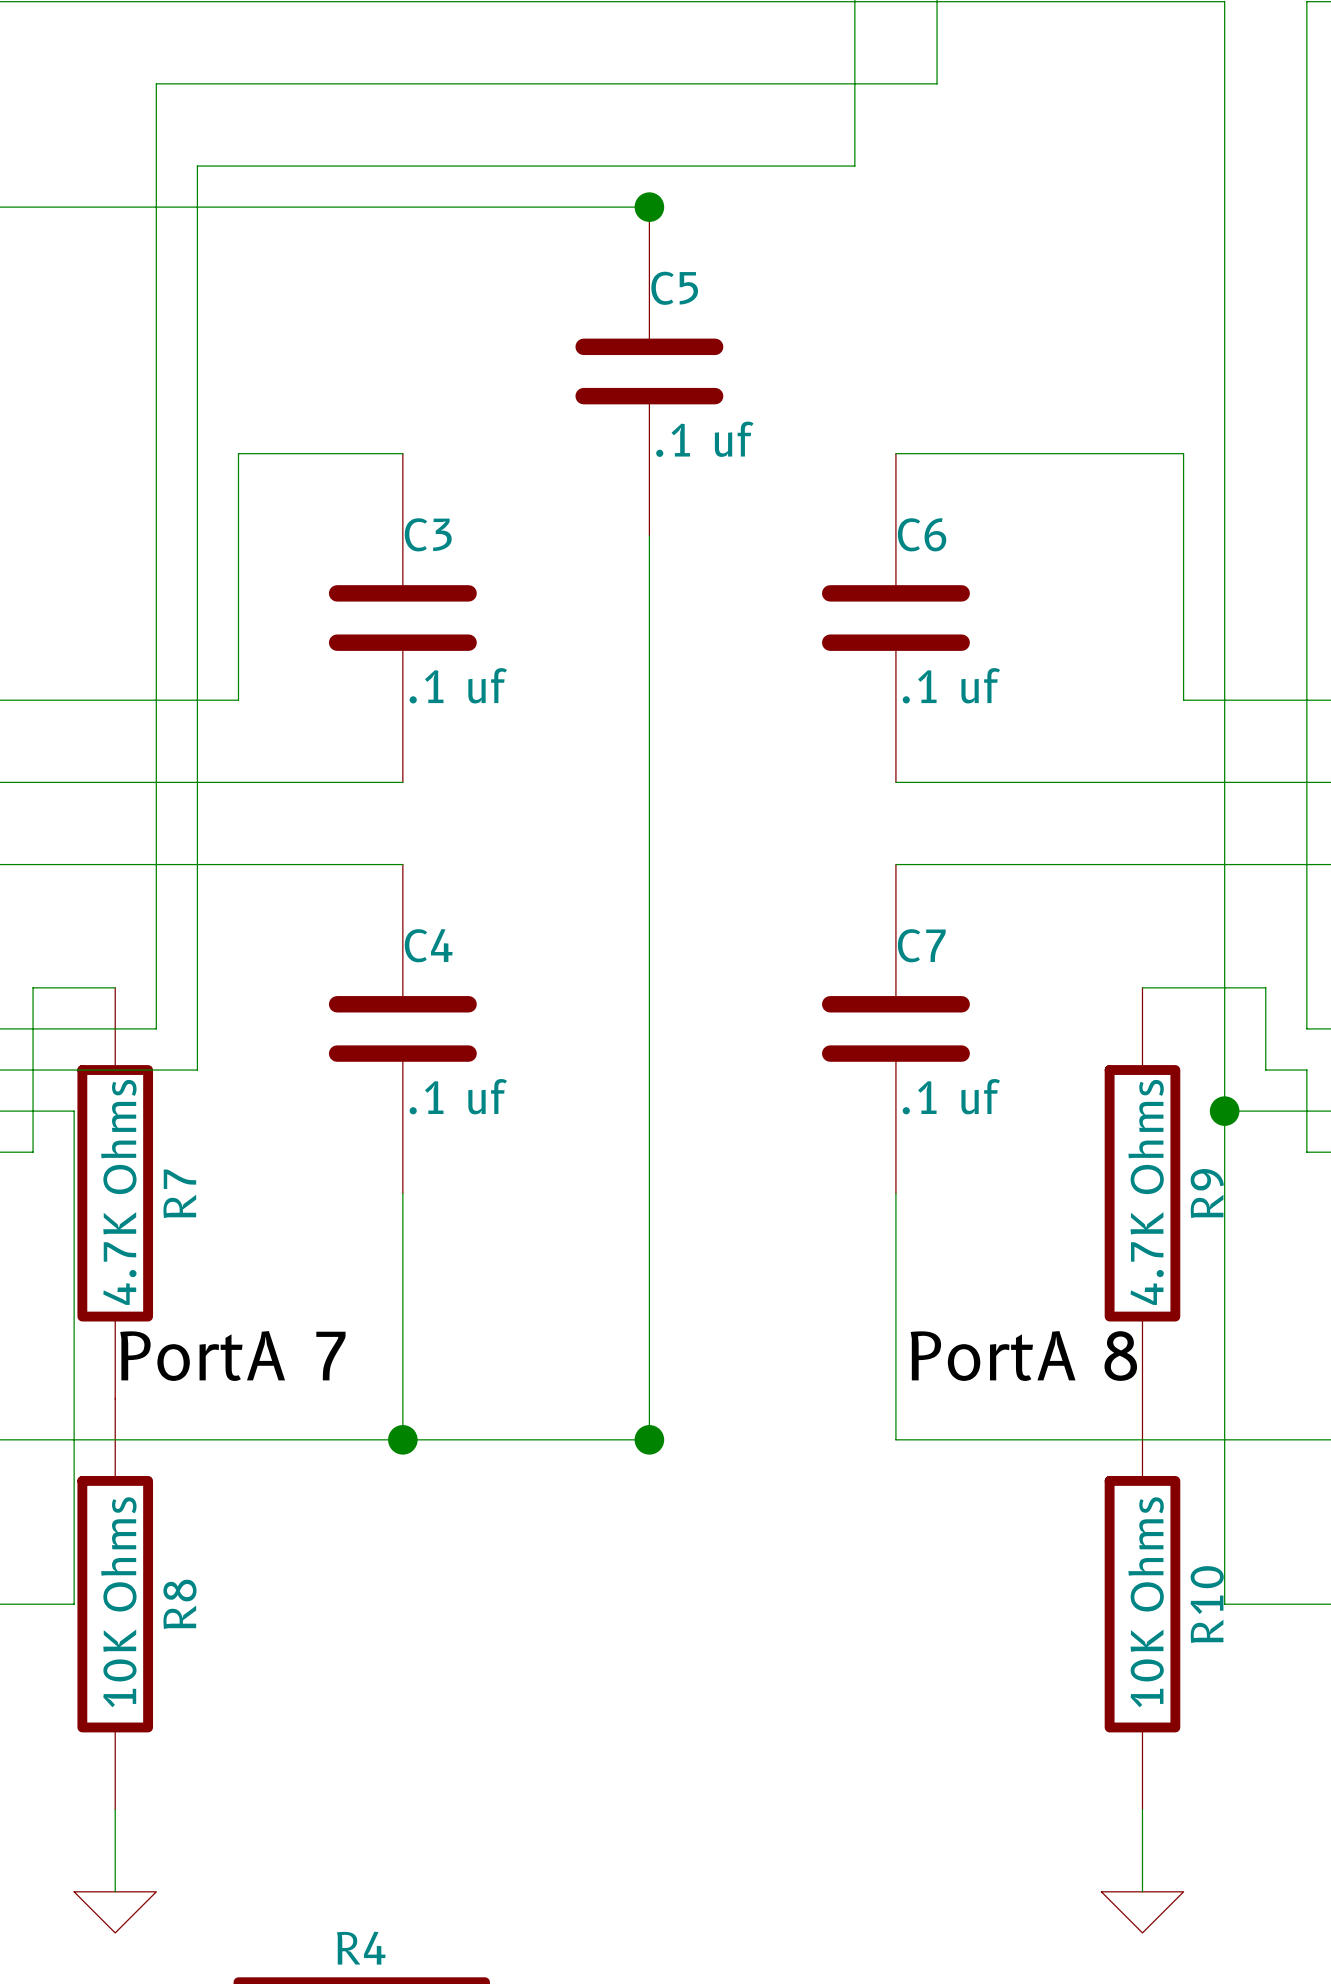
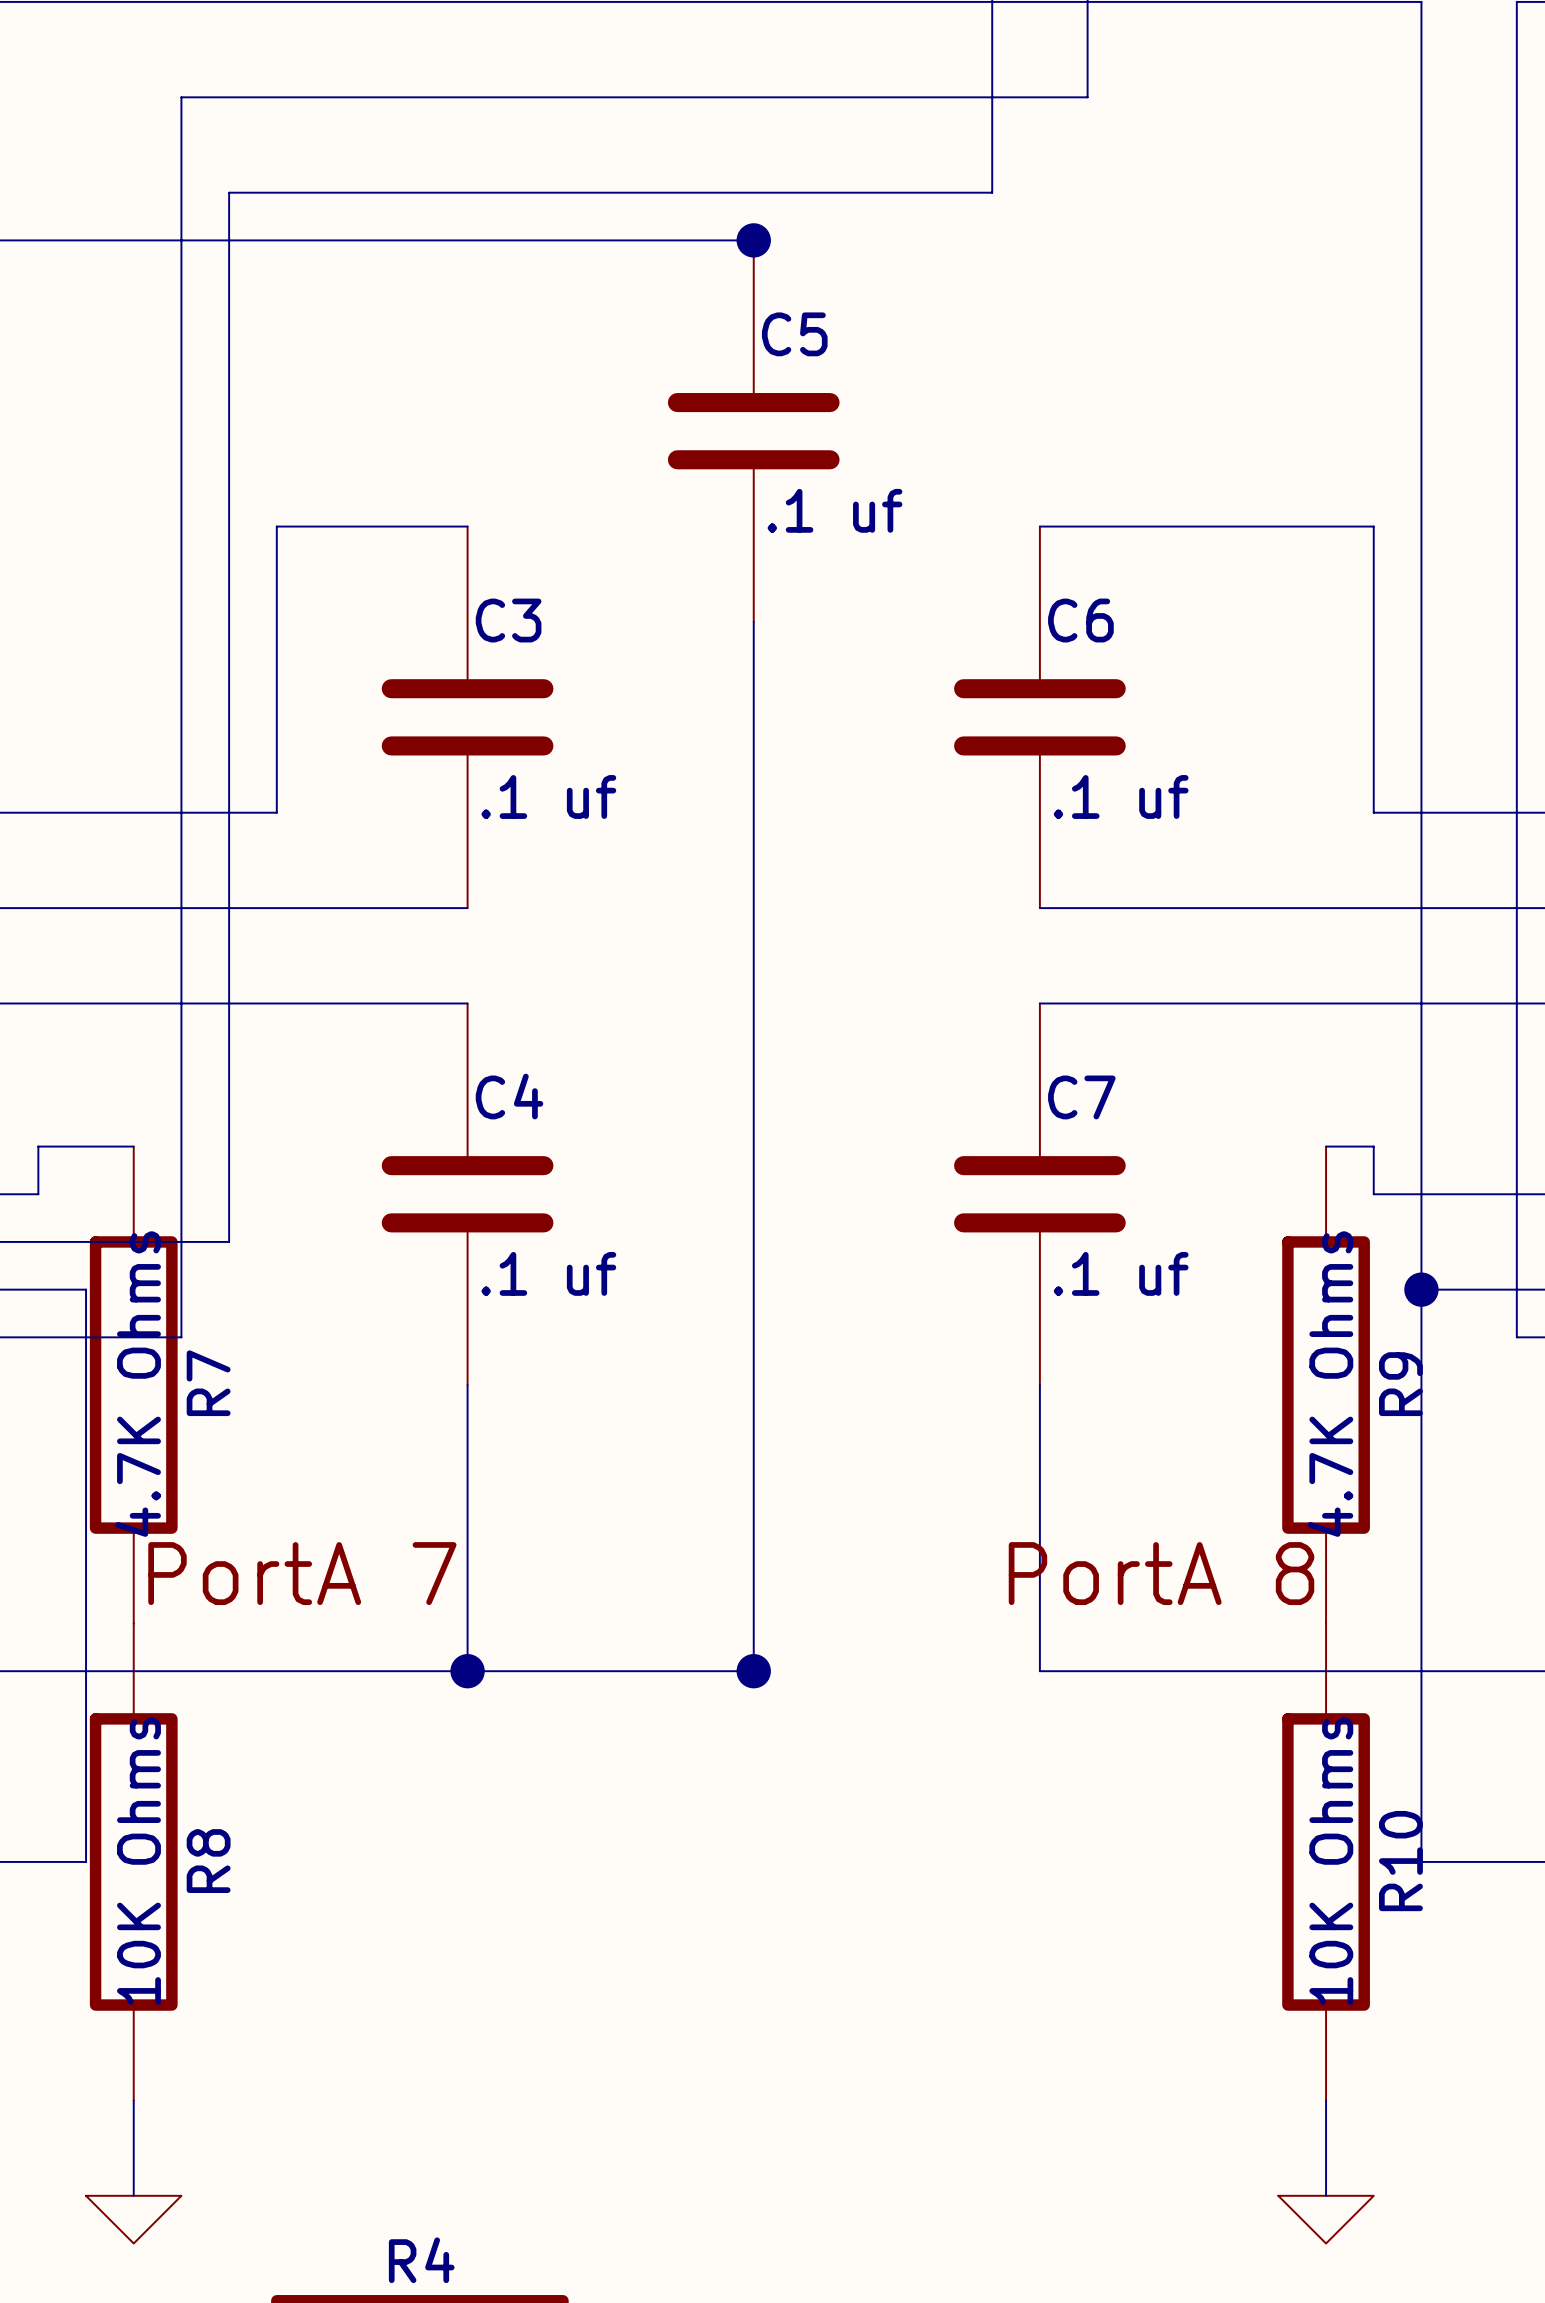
wire: (1183, 987) (1265, 987) (1265, 1070) (1306, 1070) -> (1373, 1146) (1373, 1194) (1516, 1194) (1516, 1241)
wire: (156, 1028) (33, 1028) (33, 1152) -> (181, 1194) (181, 1337) (38, 1337)

